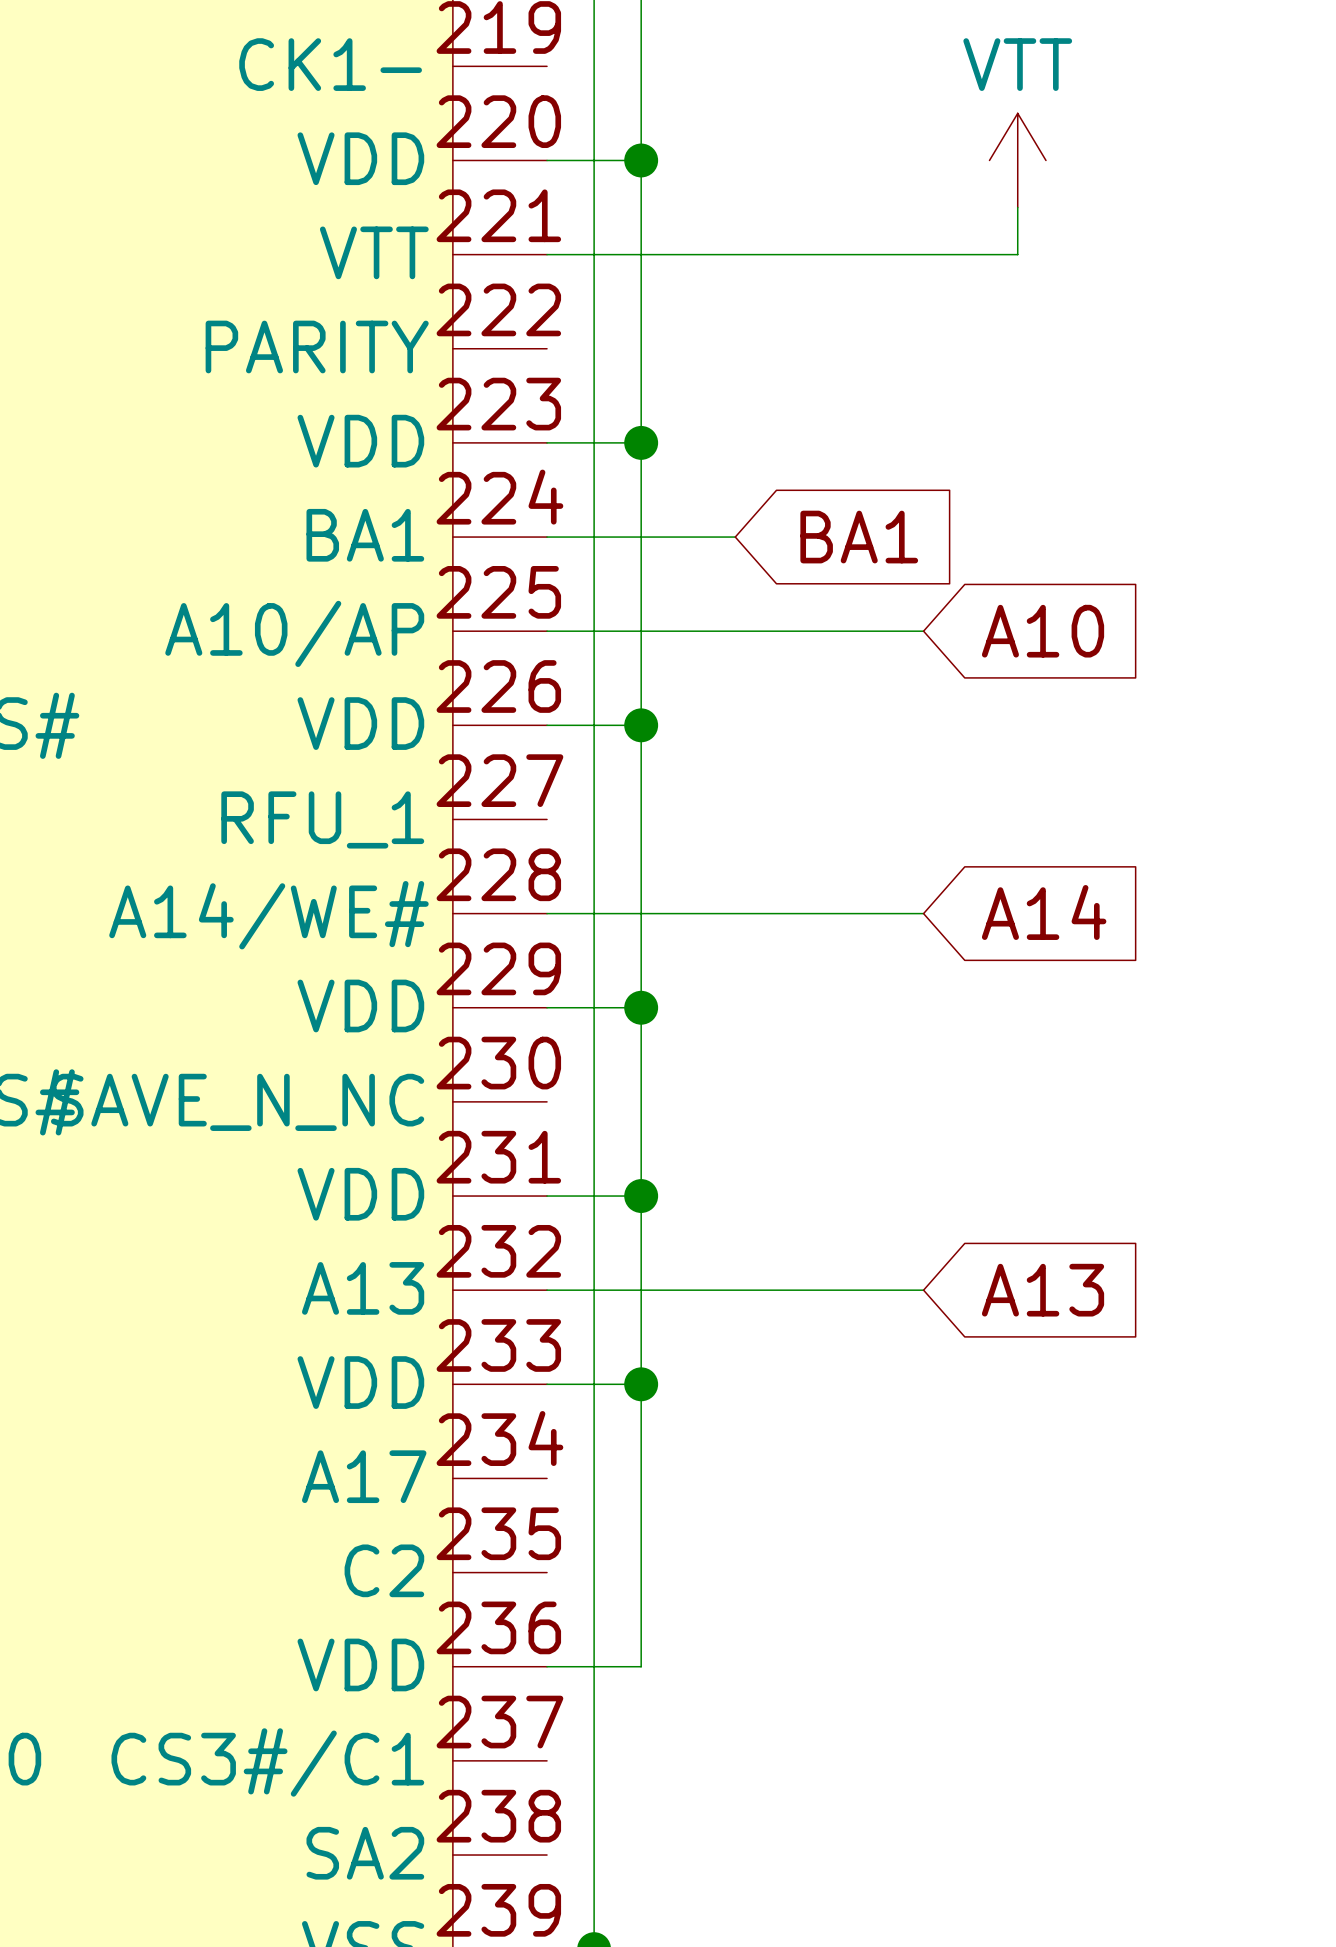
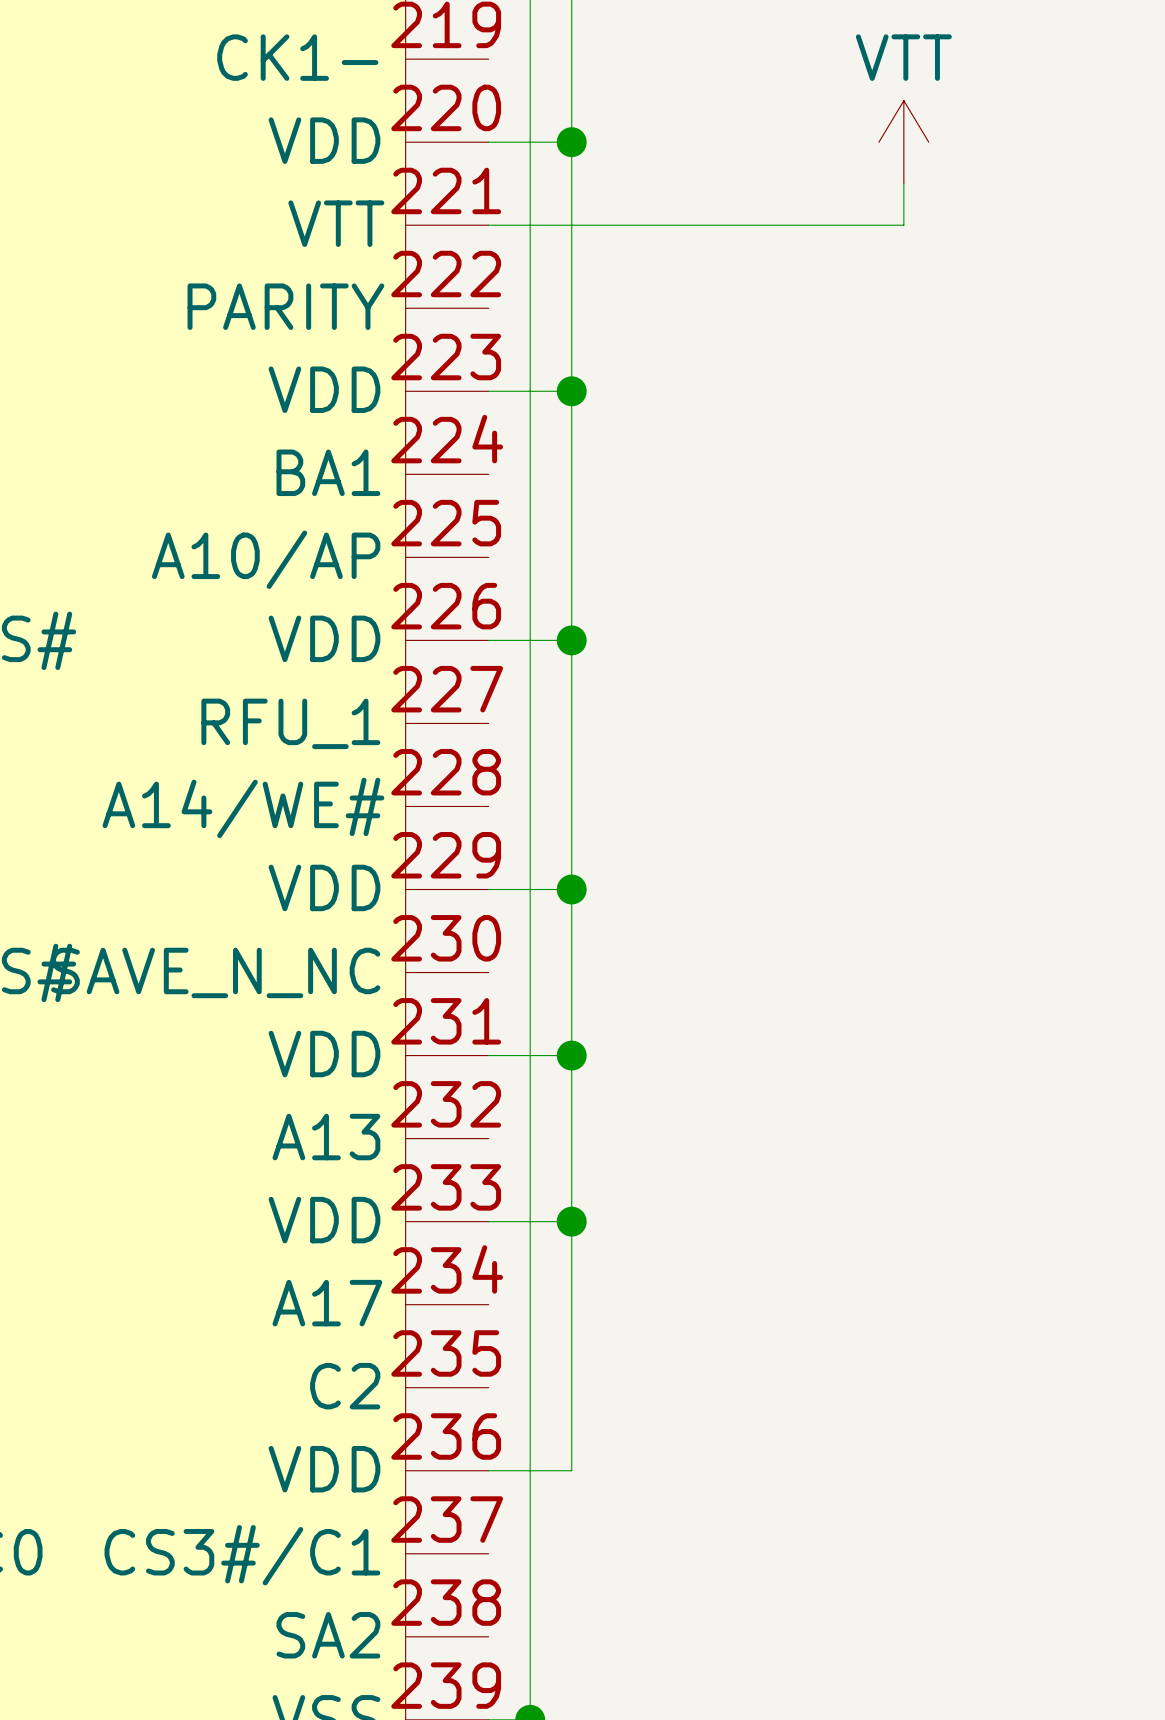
wire: (547, 537) (735, 537) -> none
global label: BA1 (859, 537) -> none
wire: (547, 631) (923, 631) -> none
global label: A10 (1043, 631) -> none
global label: A14 (1044, 912) -> none
wire: (547, 913) (923, 913) -> none
wire: (547, 1290) (923, 1290) -> none
global label: A13 (1043, 1290) -> none

